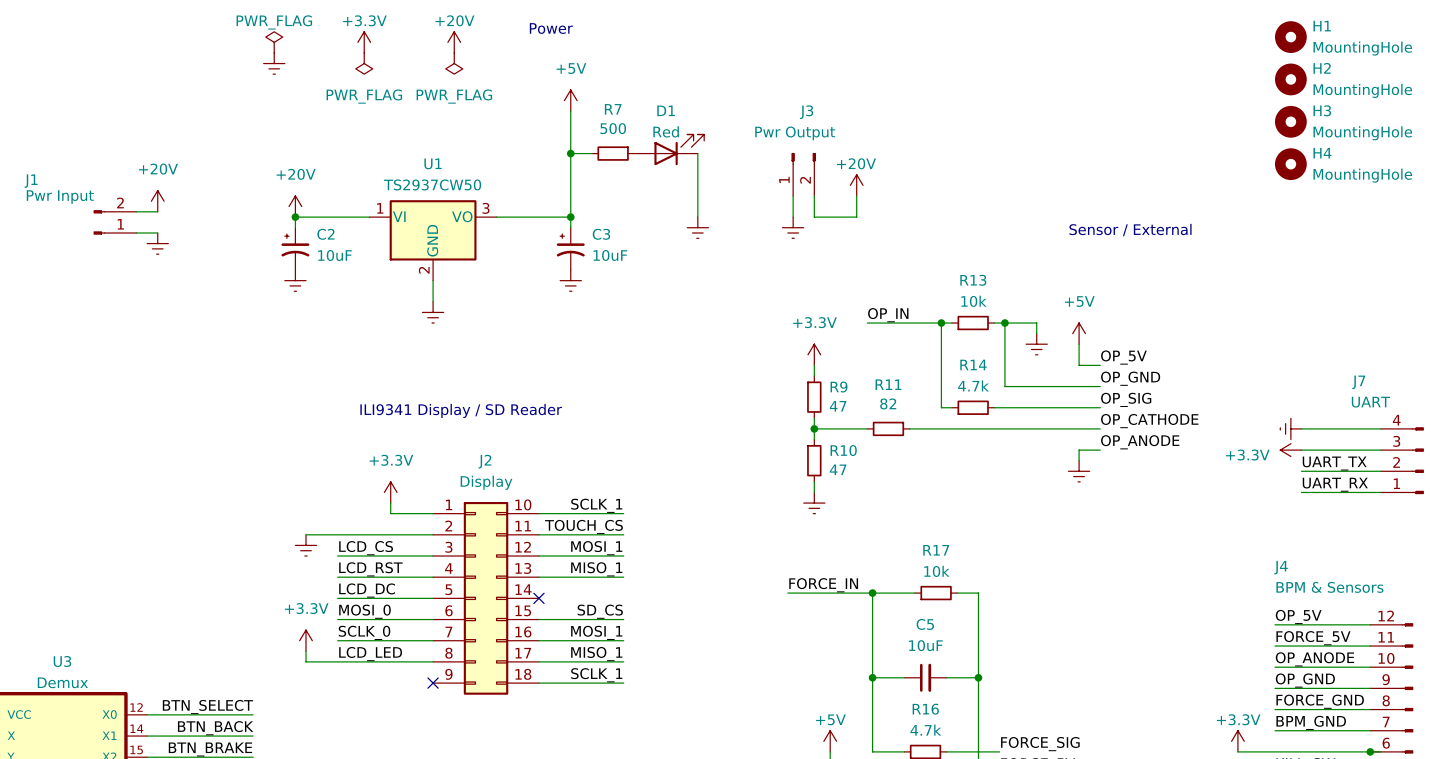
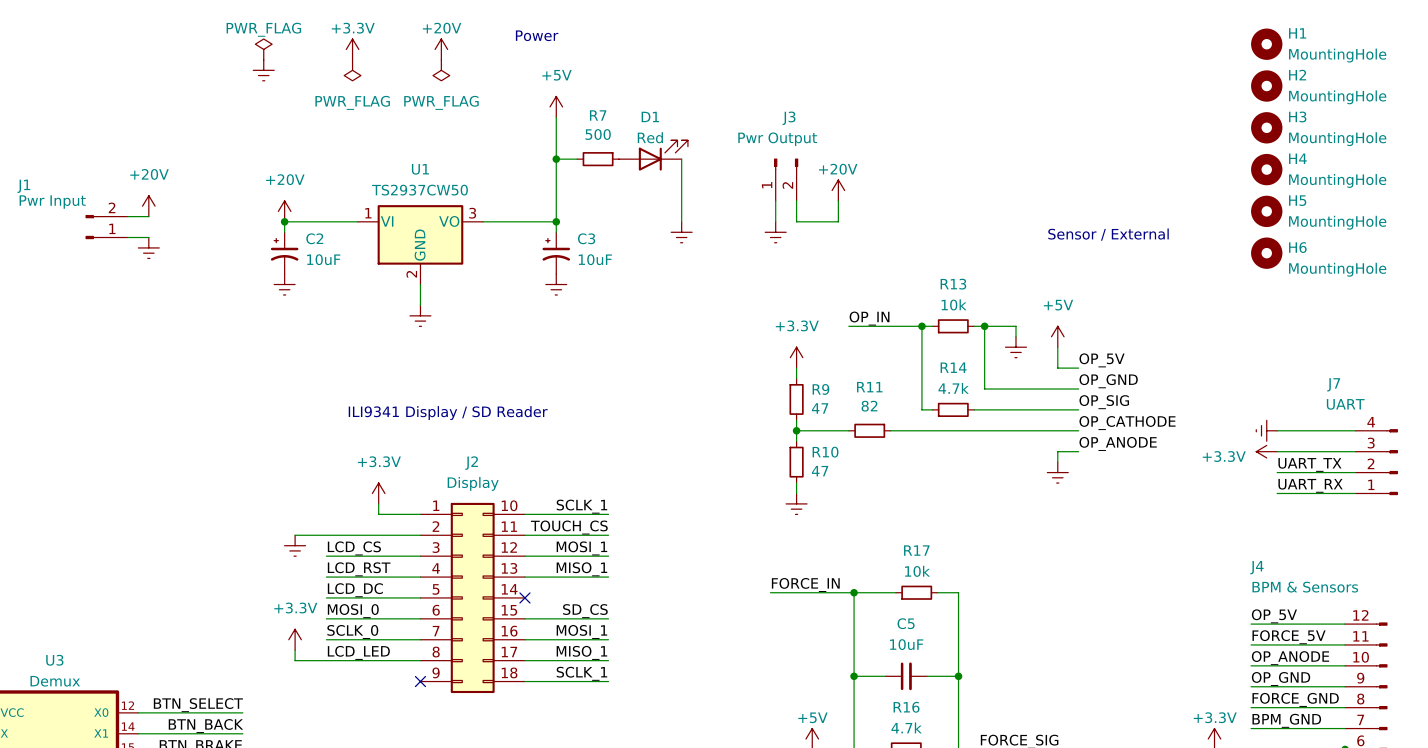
H5: none -> MountingHole (1266, 211)
H6: none -> MountingHole (1266, 253)

